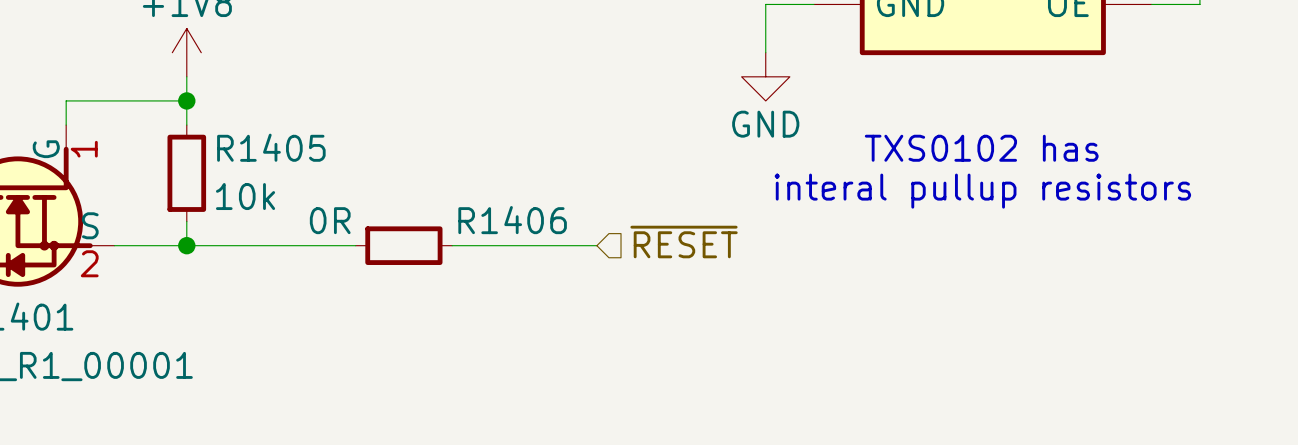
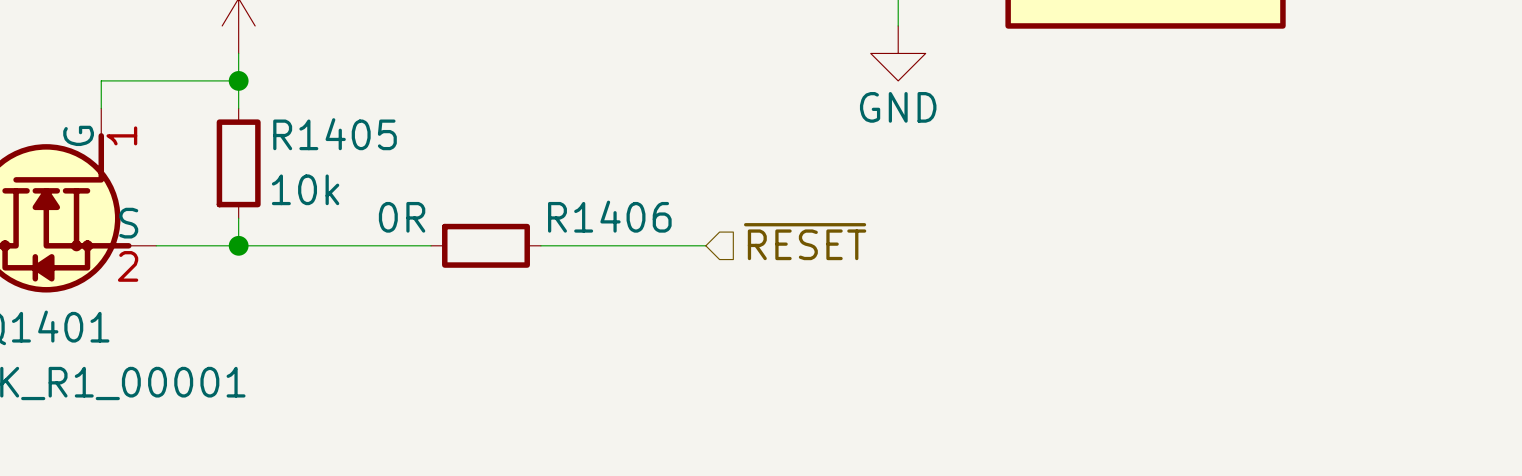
text: TXS0102 has (981, 148) -> none
text: interal pullup resistors (982, 191) -> none

